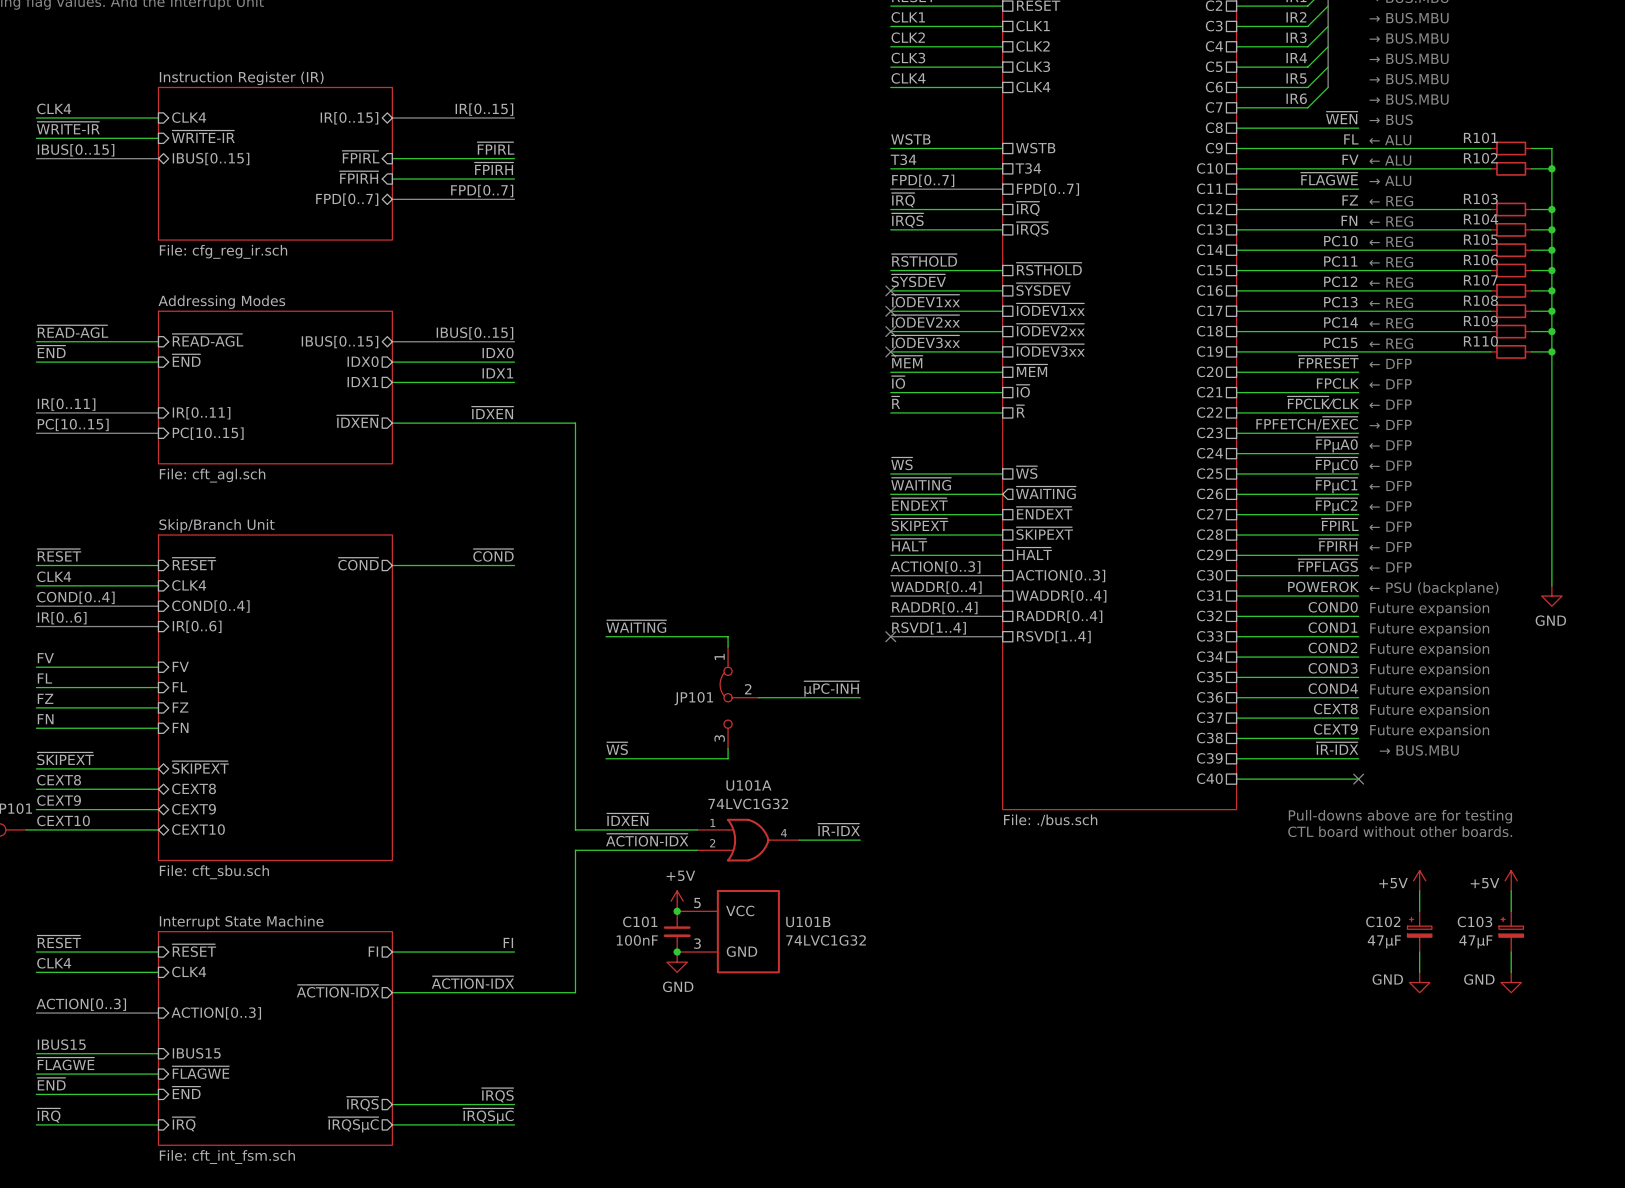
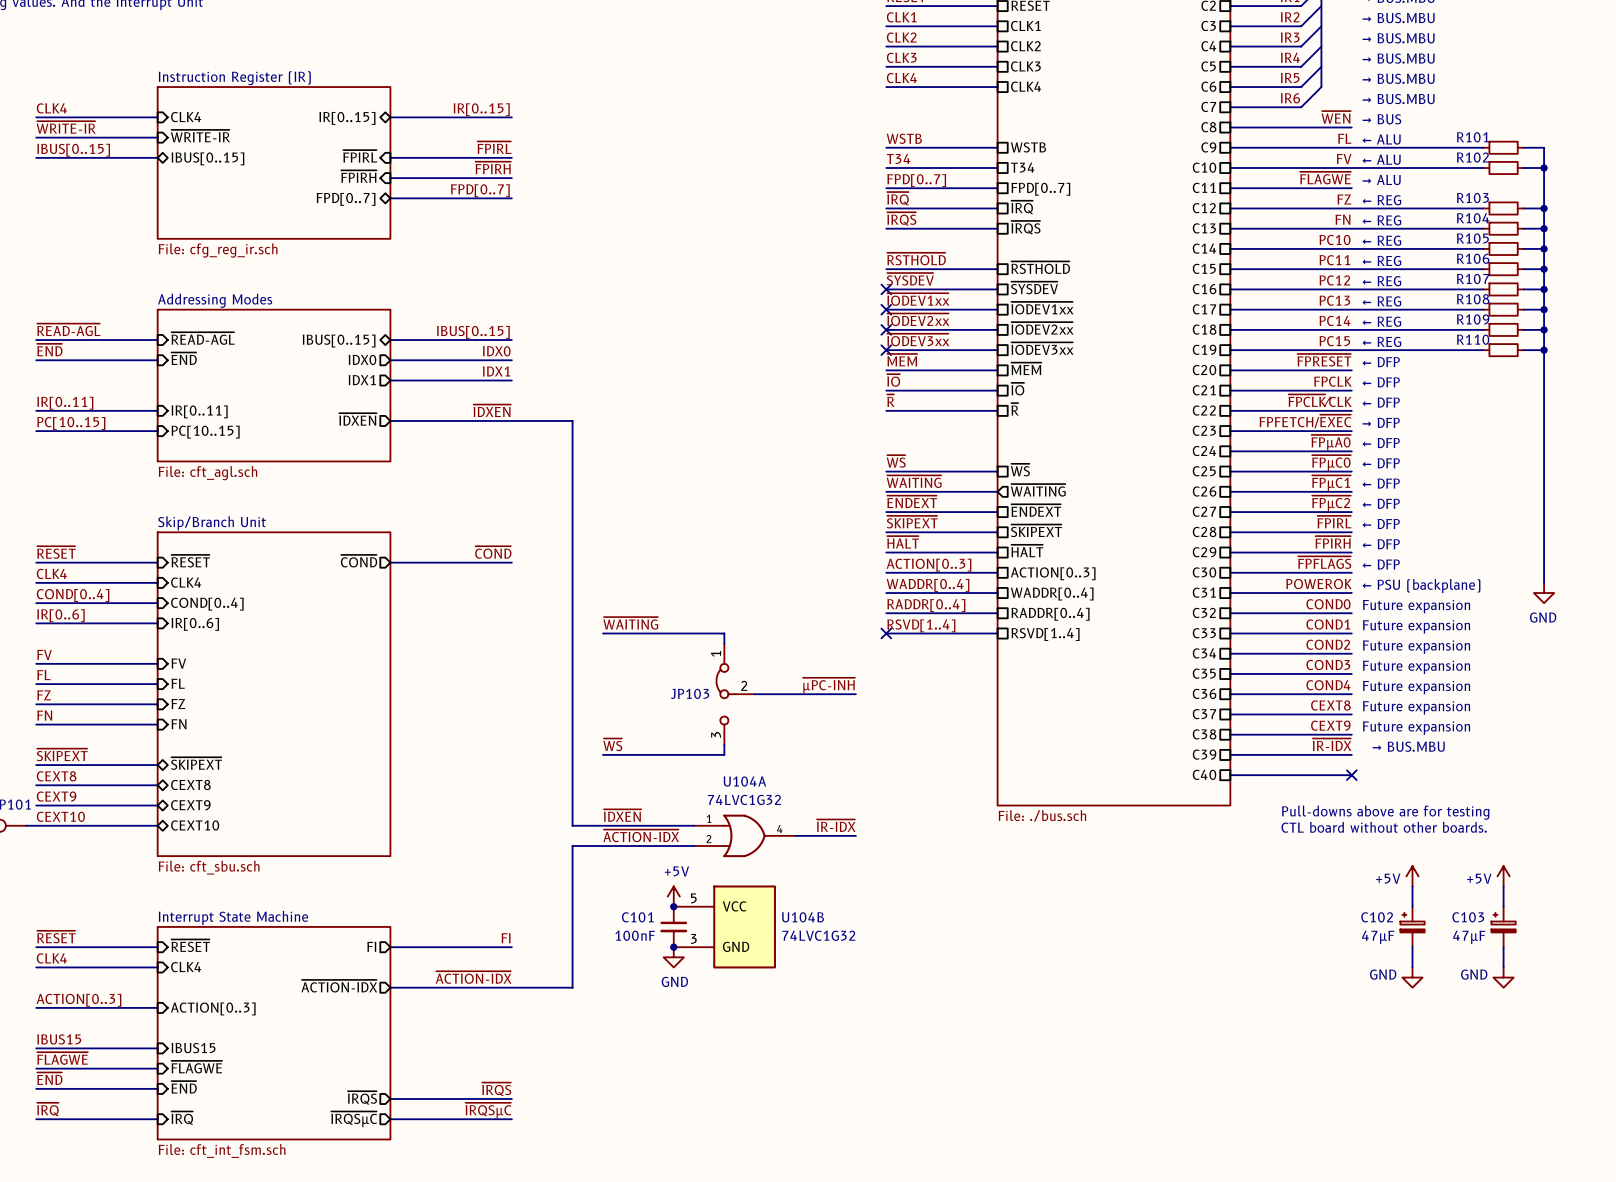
JP101 name: JP101 (693, 698) -> JP103 (690, 693)
U101A name: U101A (748, 785) -> U104A (744, 781)
U101B name: U101B (808, 921) -> U104B (802, 917)

